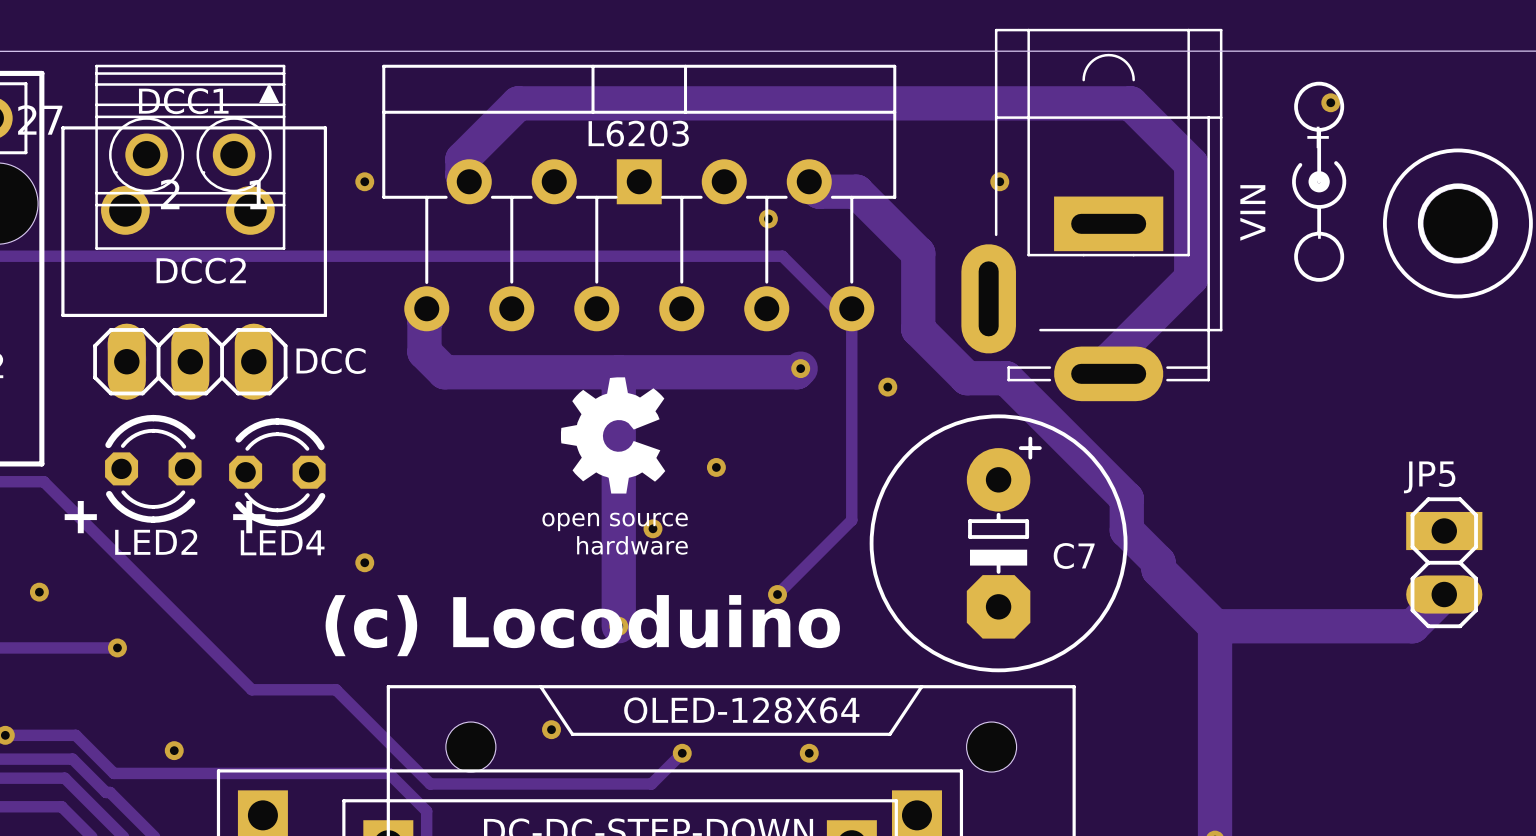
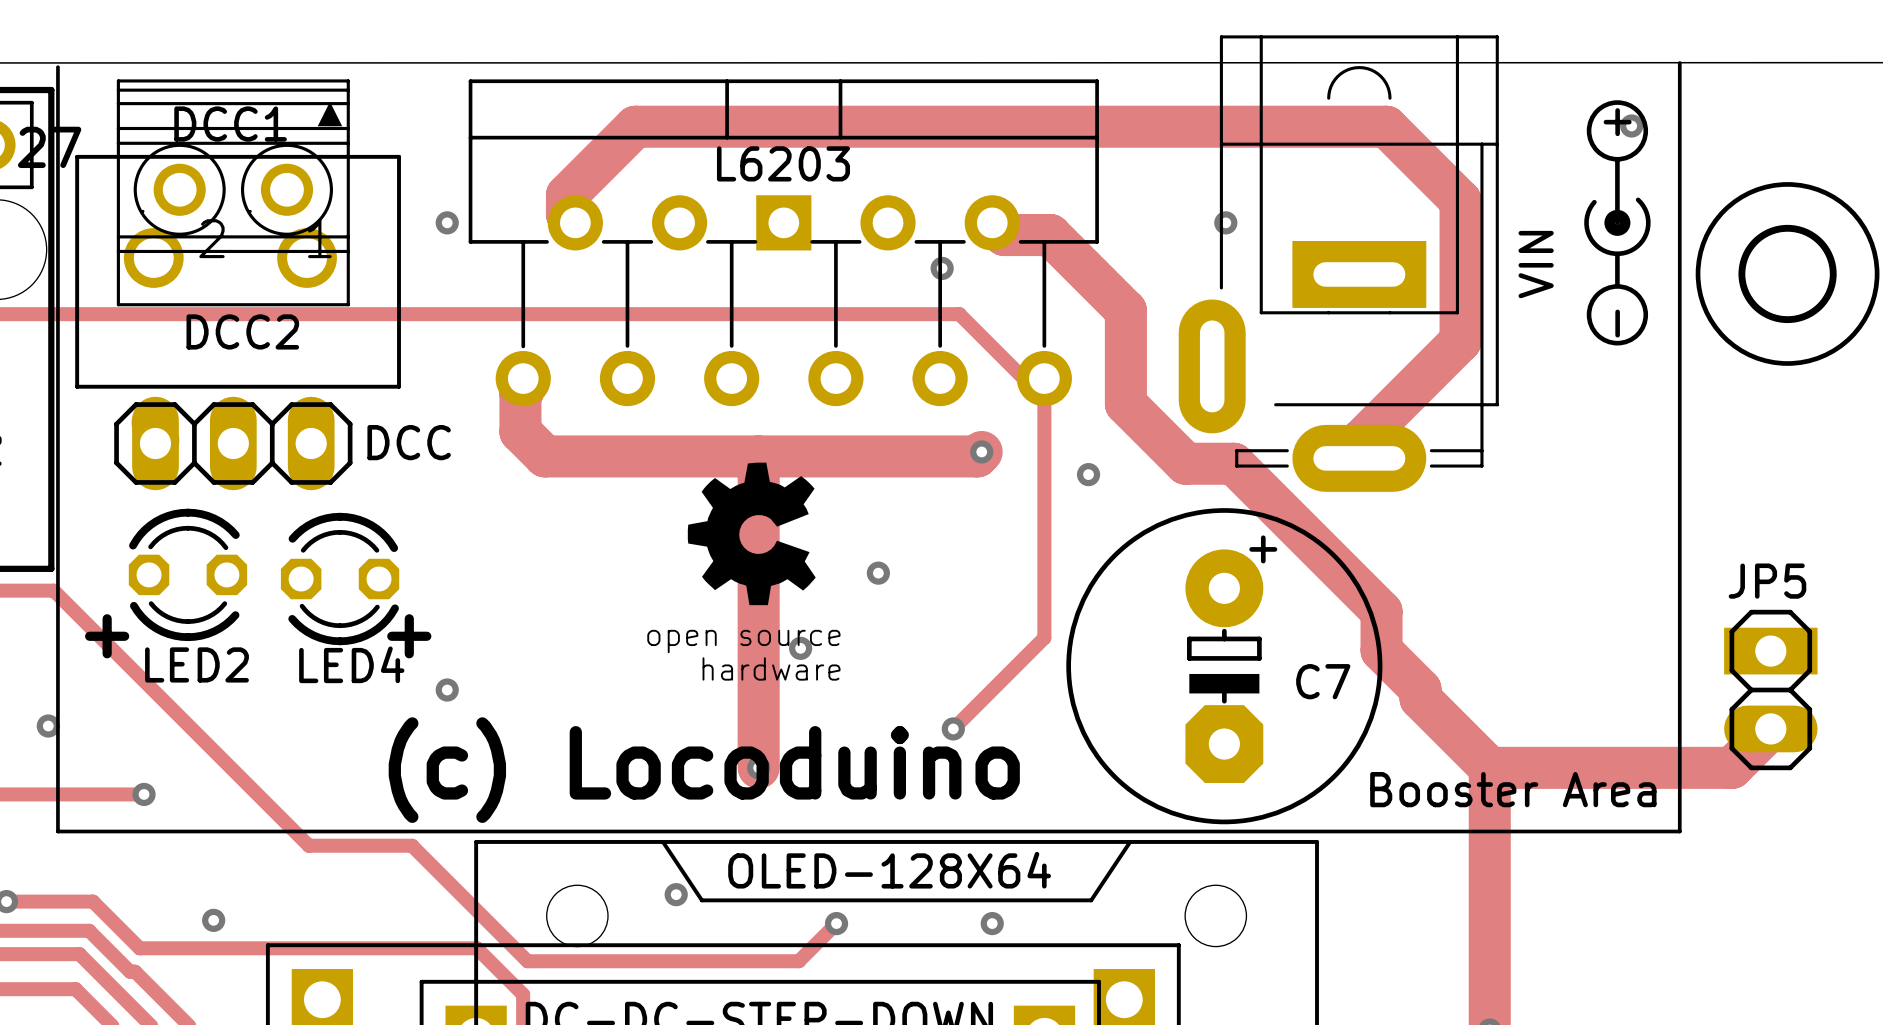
line: none -> (1679, 63) (1679, 831) (57, 831) (57, 67)
text: none -> Booster Area (1513, 789)

